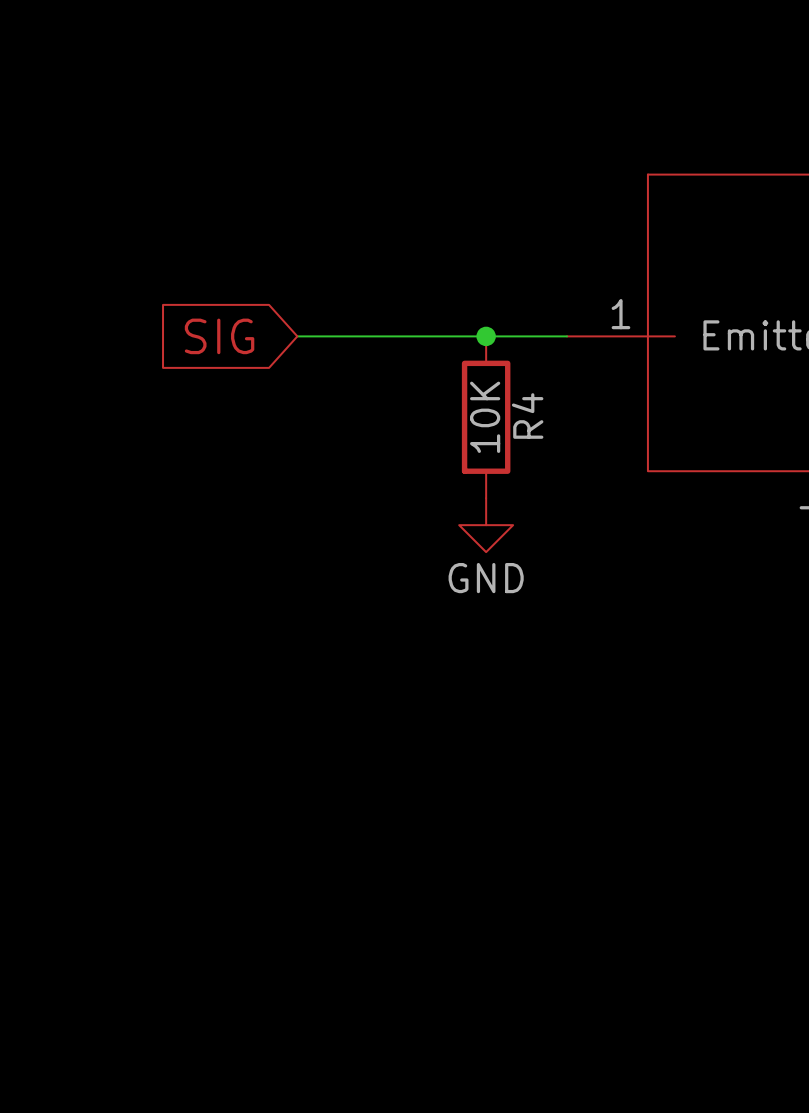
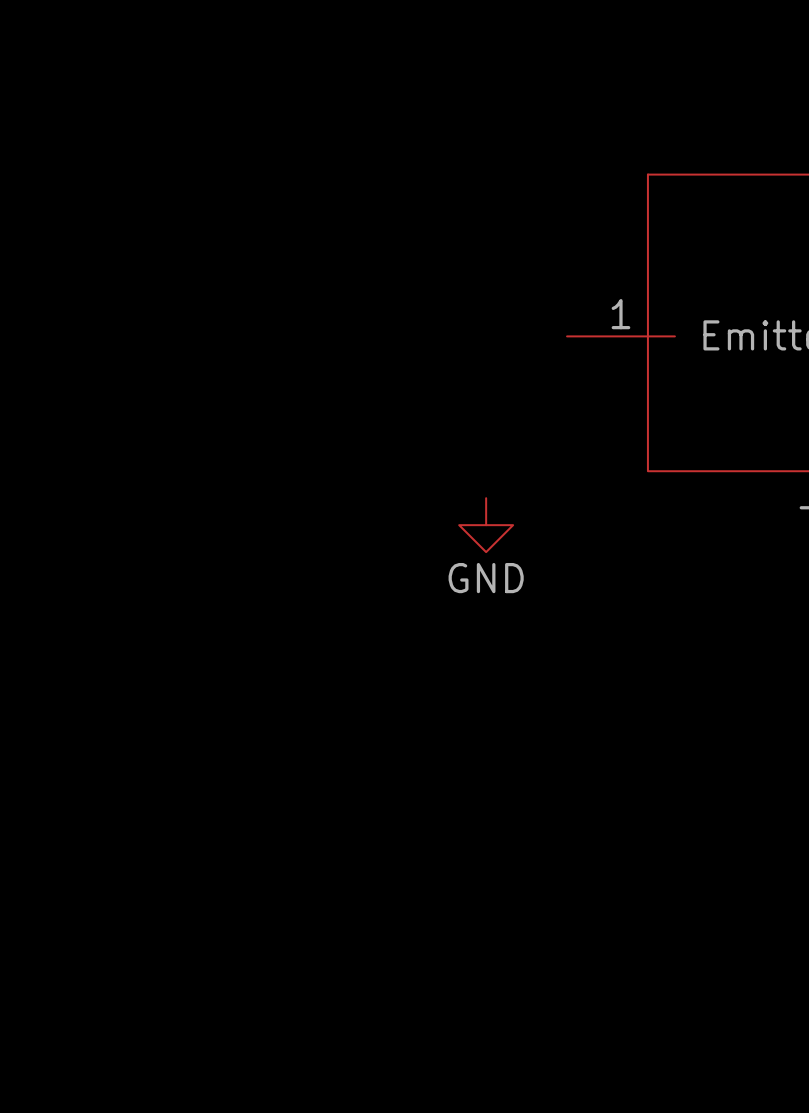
global label: SIG (219, 336) -> none
wire: (297, 336) (567, 336) -> none
junction: (486, 336) -> none
R4: 10K (486, 417) -> none

